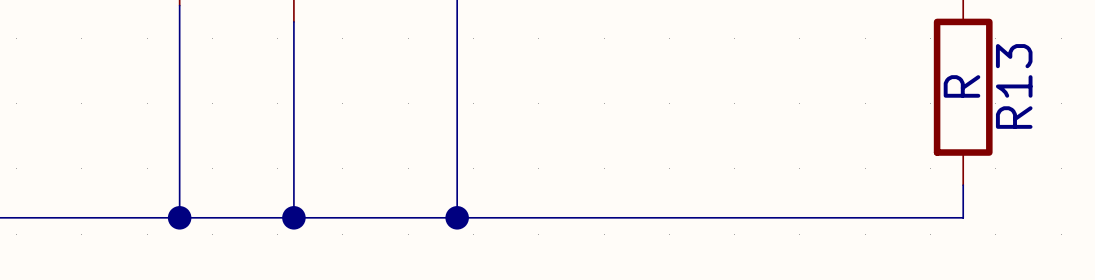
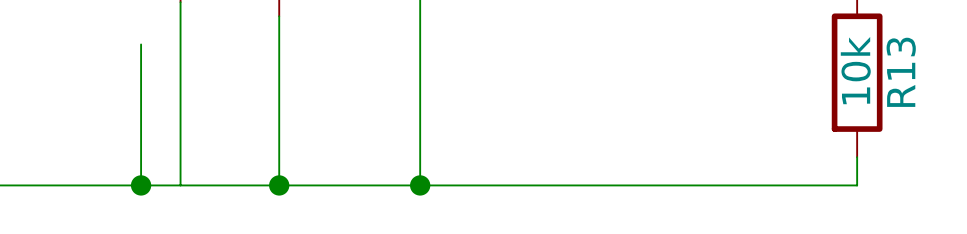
wire: none -> (141, 44) (141, 185)
R13 value: R (961, 86) -> 10k (855, 70)
junction position: (179, 217) -> (141, 185)

